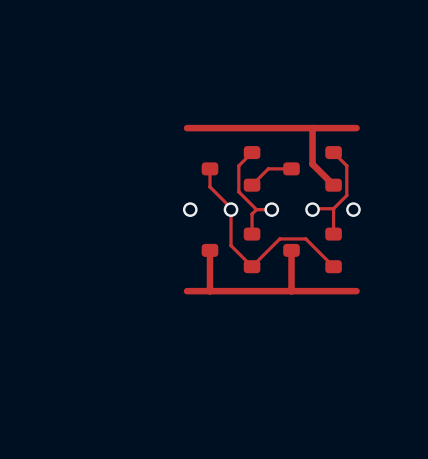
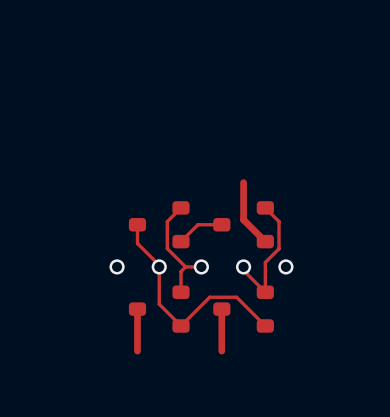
top track: (356, 128) (187, 128) -> none
top track: (346, 192) (346, 195) (333, 208) (312, 209) -> (279, 248) (265, 262) (265, 265)
top track: none -> (240, 266) (265, 292)
top track: (356, 291) (187, 291) -> none

